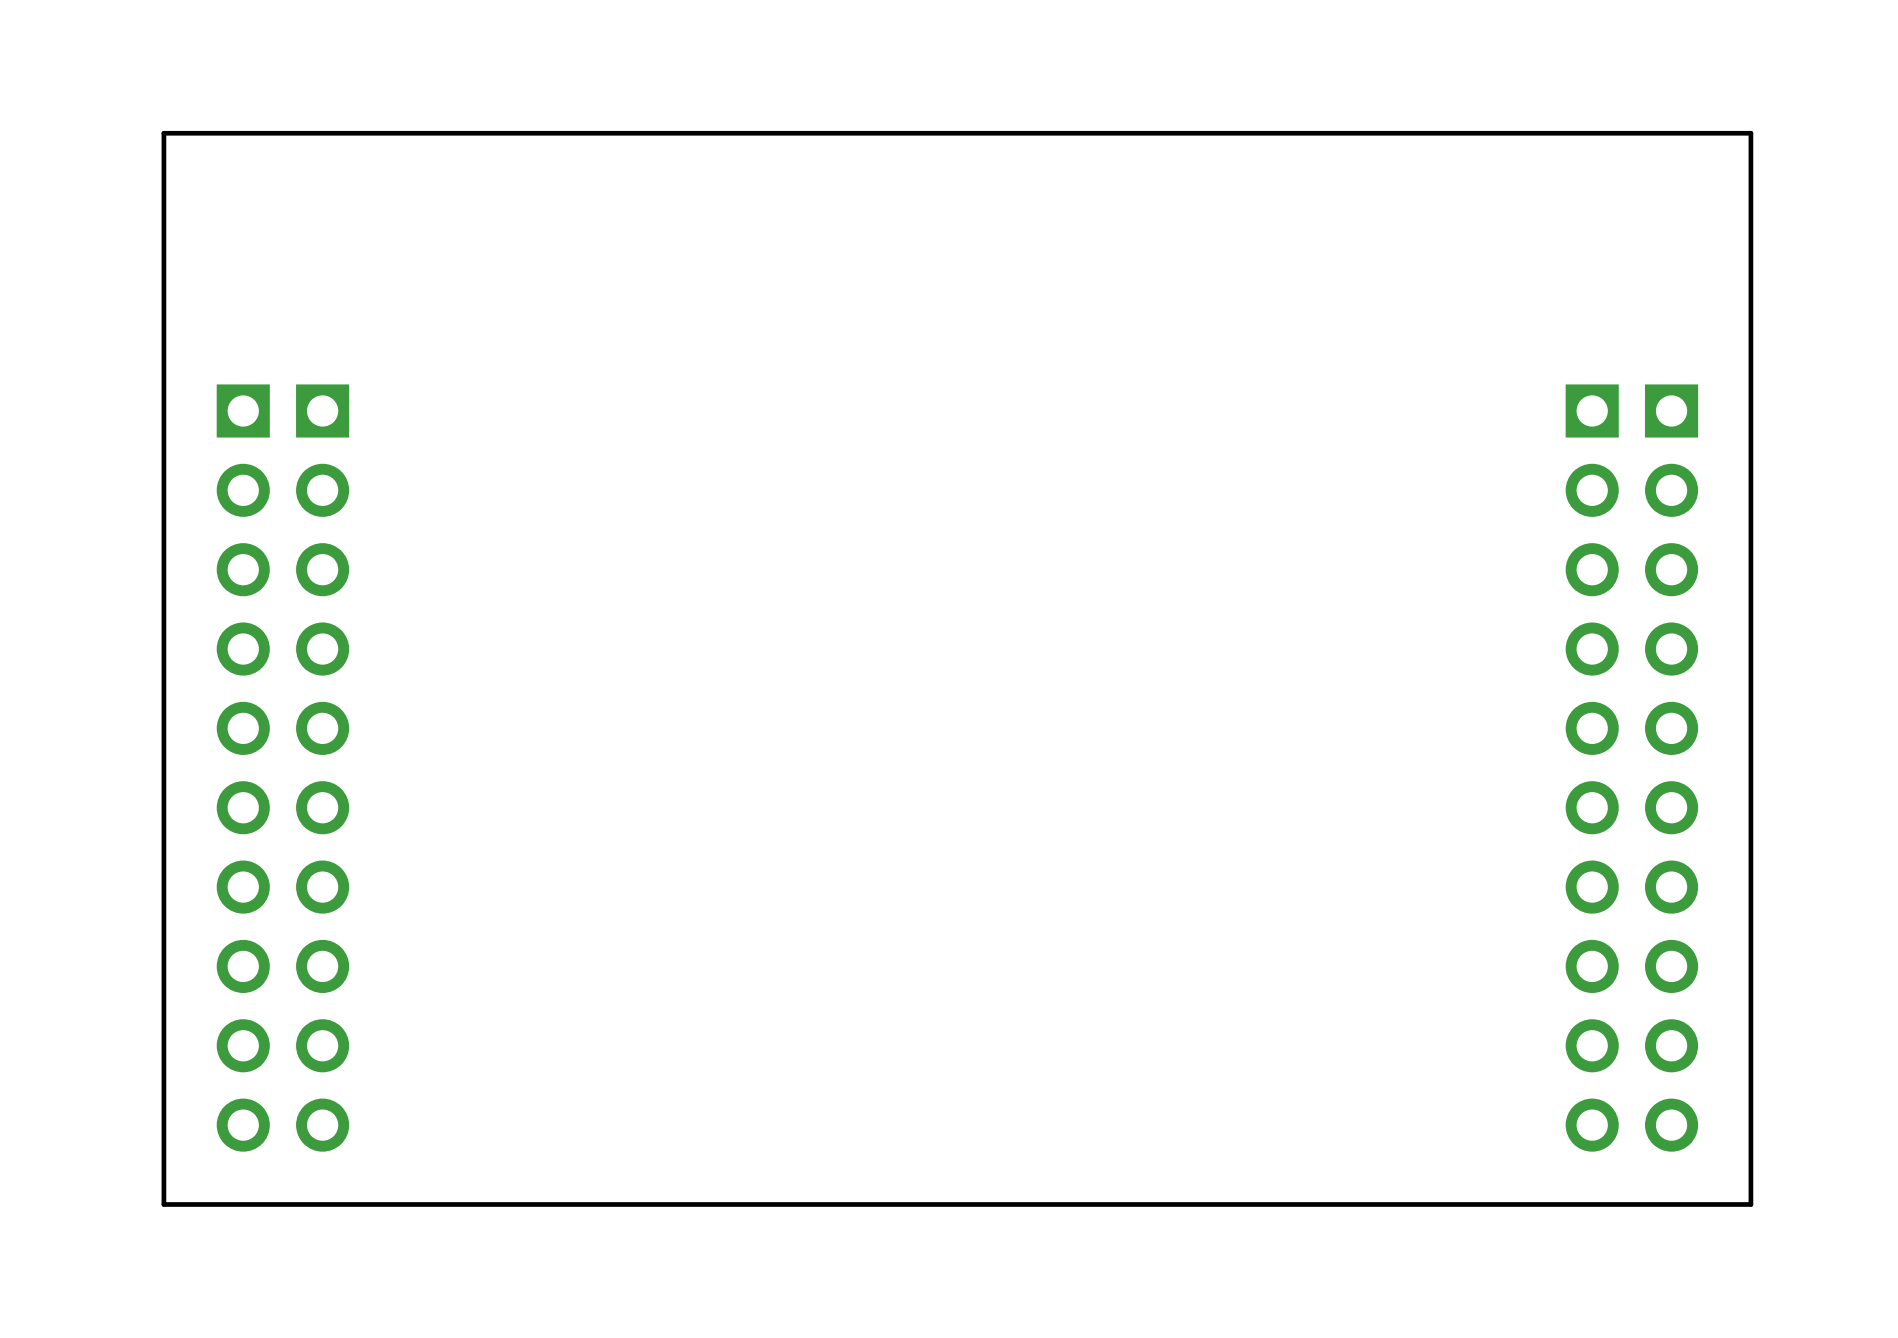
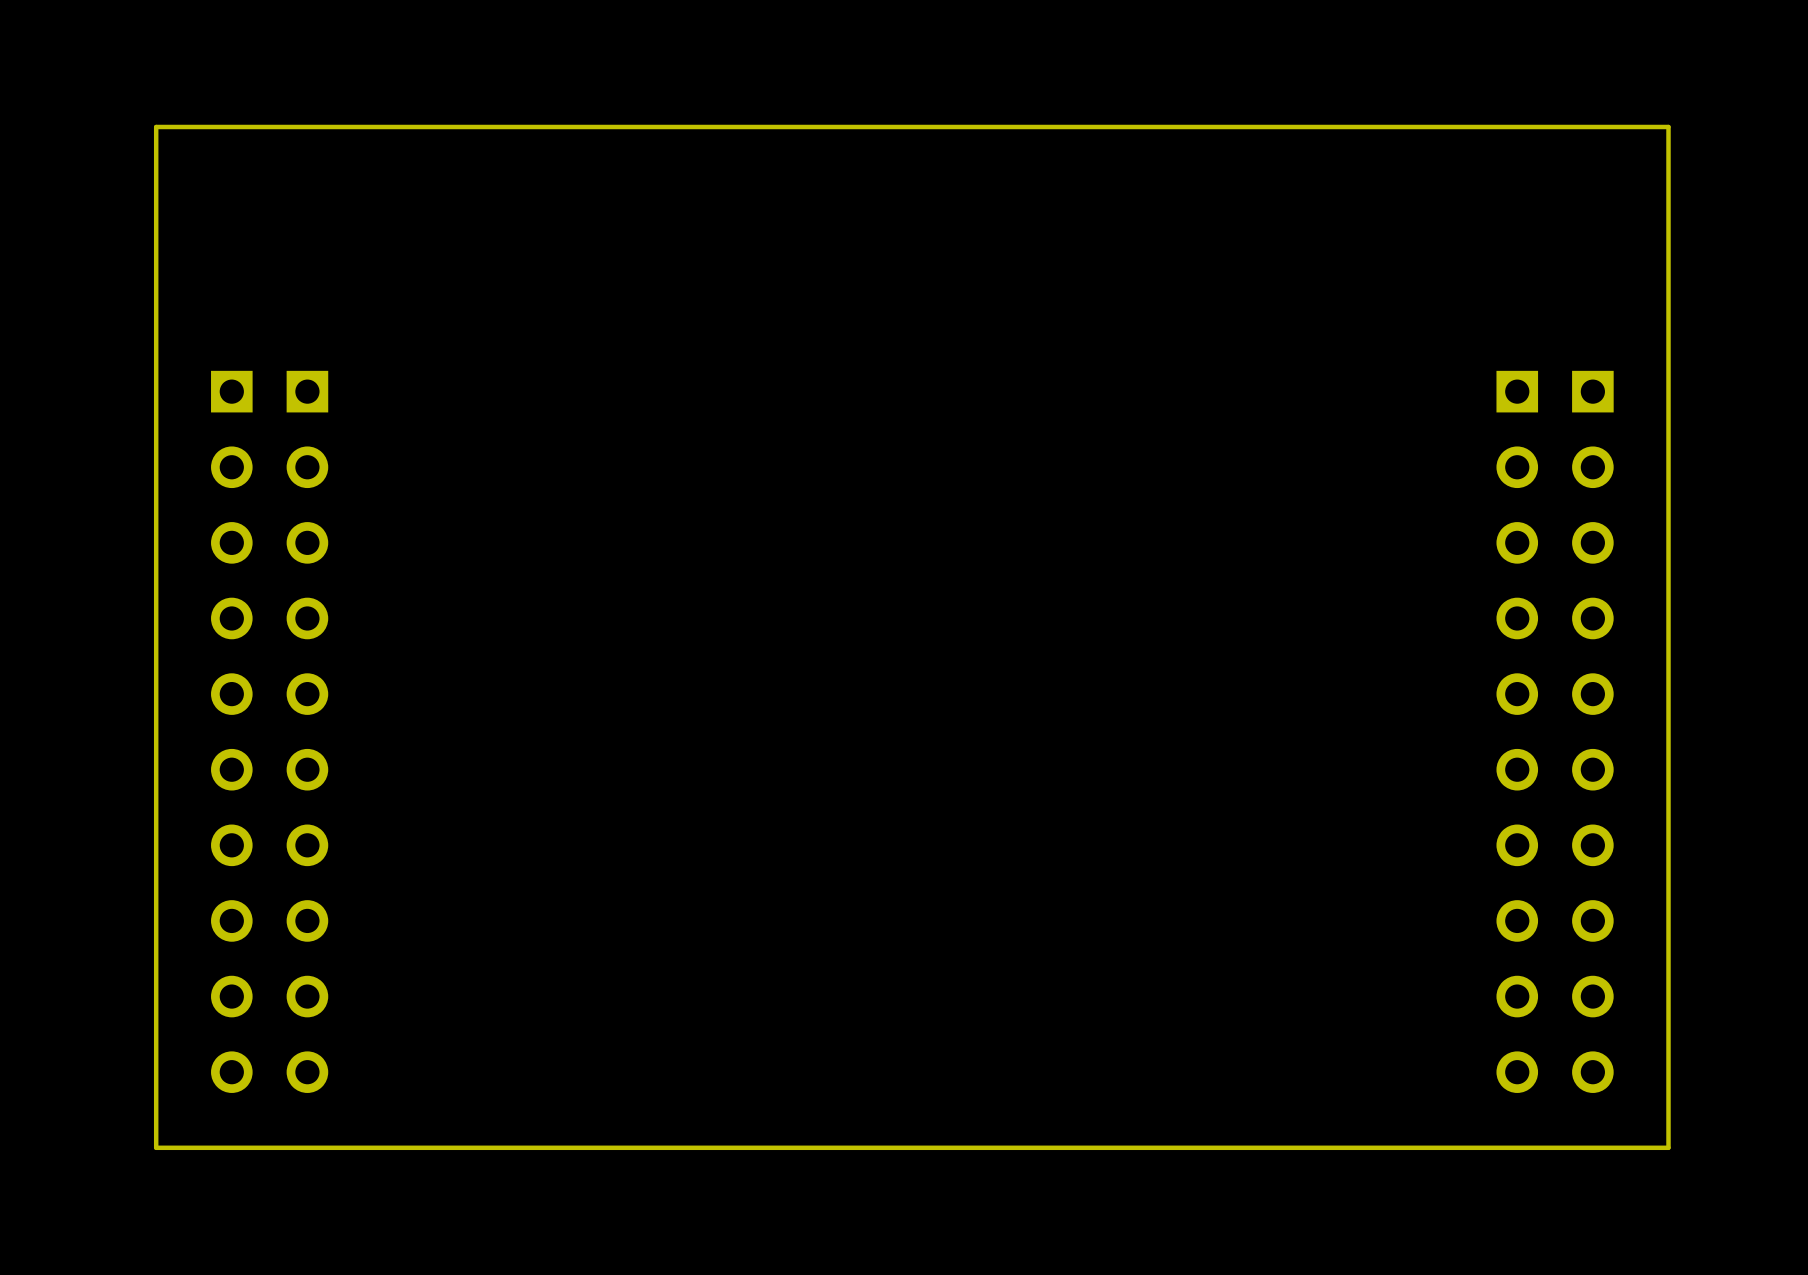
part footprint: [216, 384, 270, 1152] -> [211, 370, 253, 1093]
part footprint: [296, 384, 350, 1152] -> [286, 370, 329, 1093]
part footprint: [1565, 384, 1619, 1152] -> [1496, 370, 1539, 1093]
part footprint: [1645, 384, 1699, 1152] -> [1572, 370, 1614, 1093]

